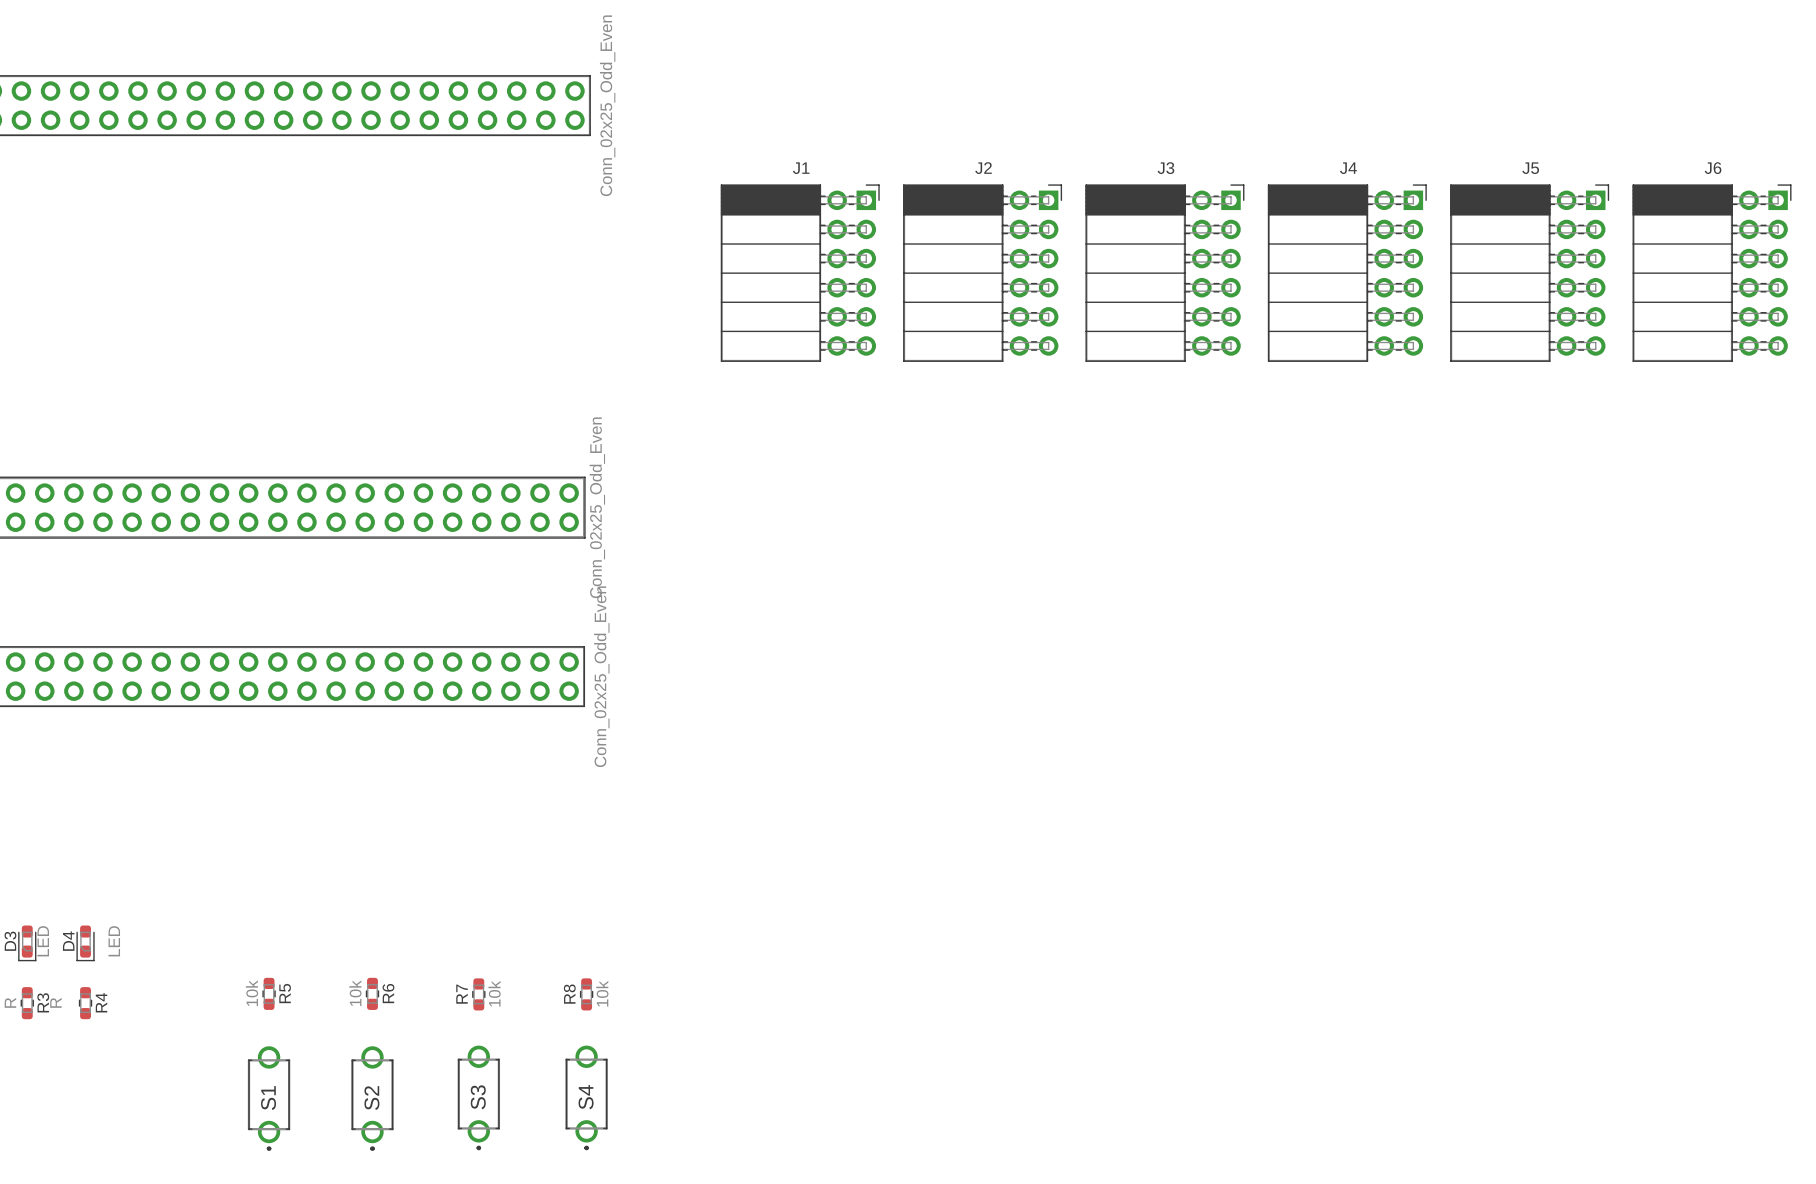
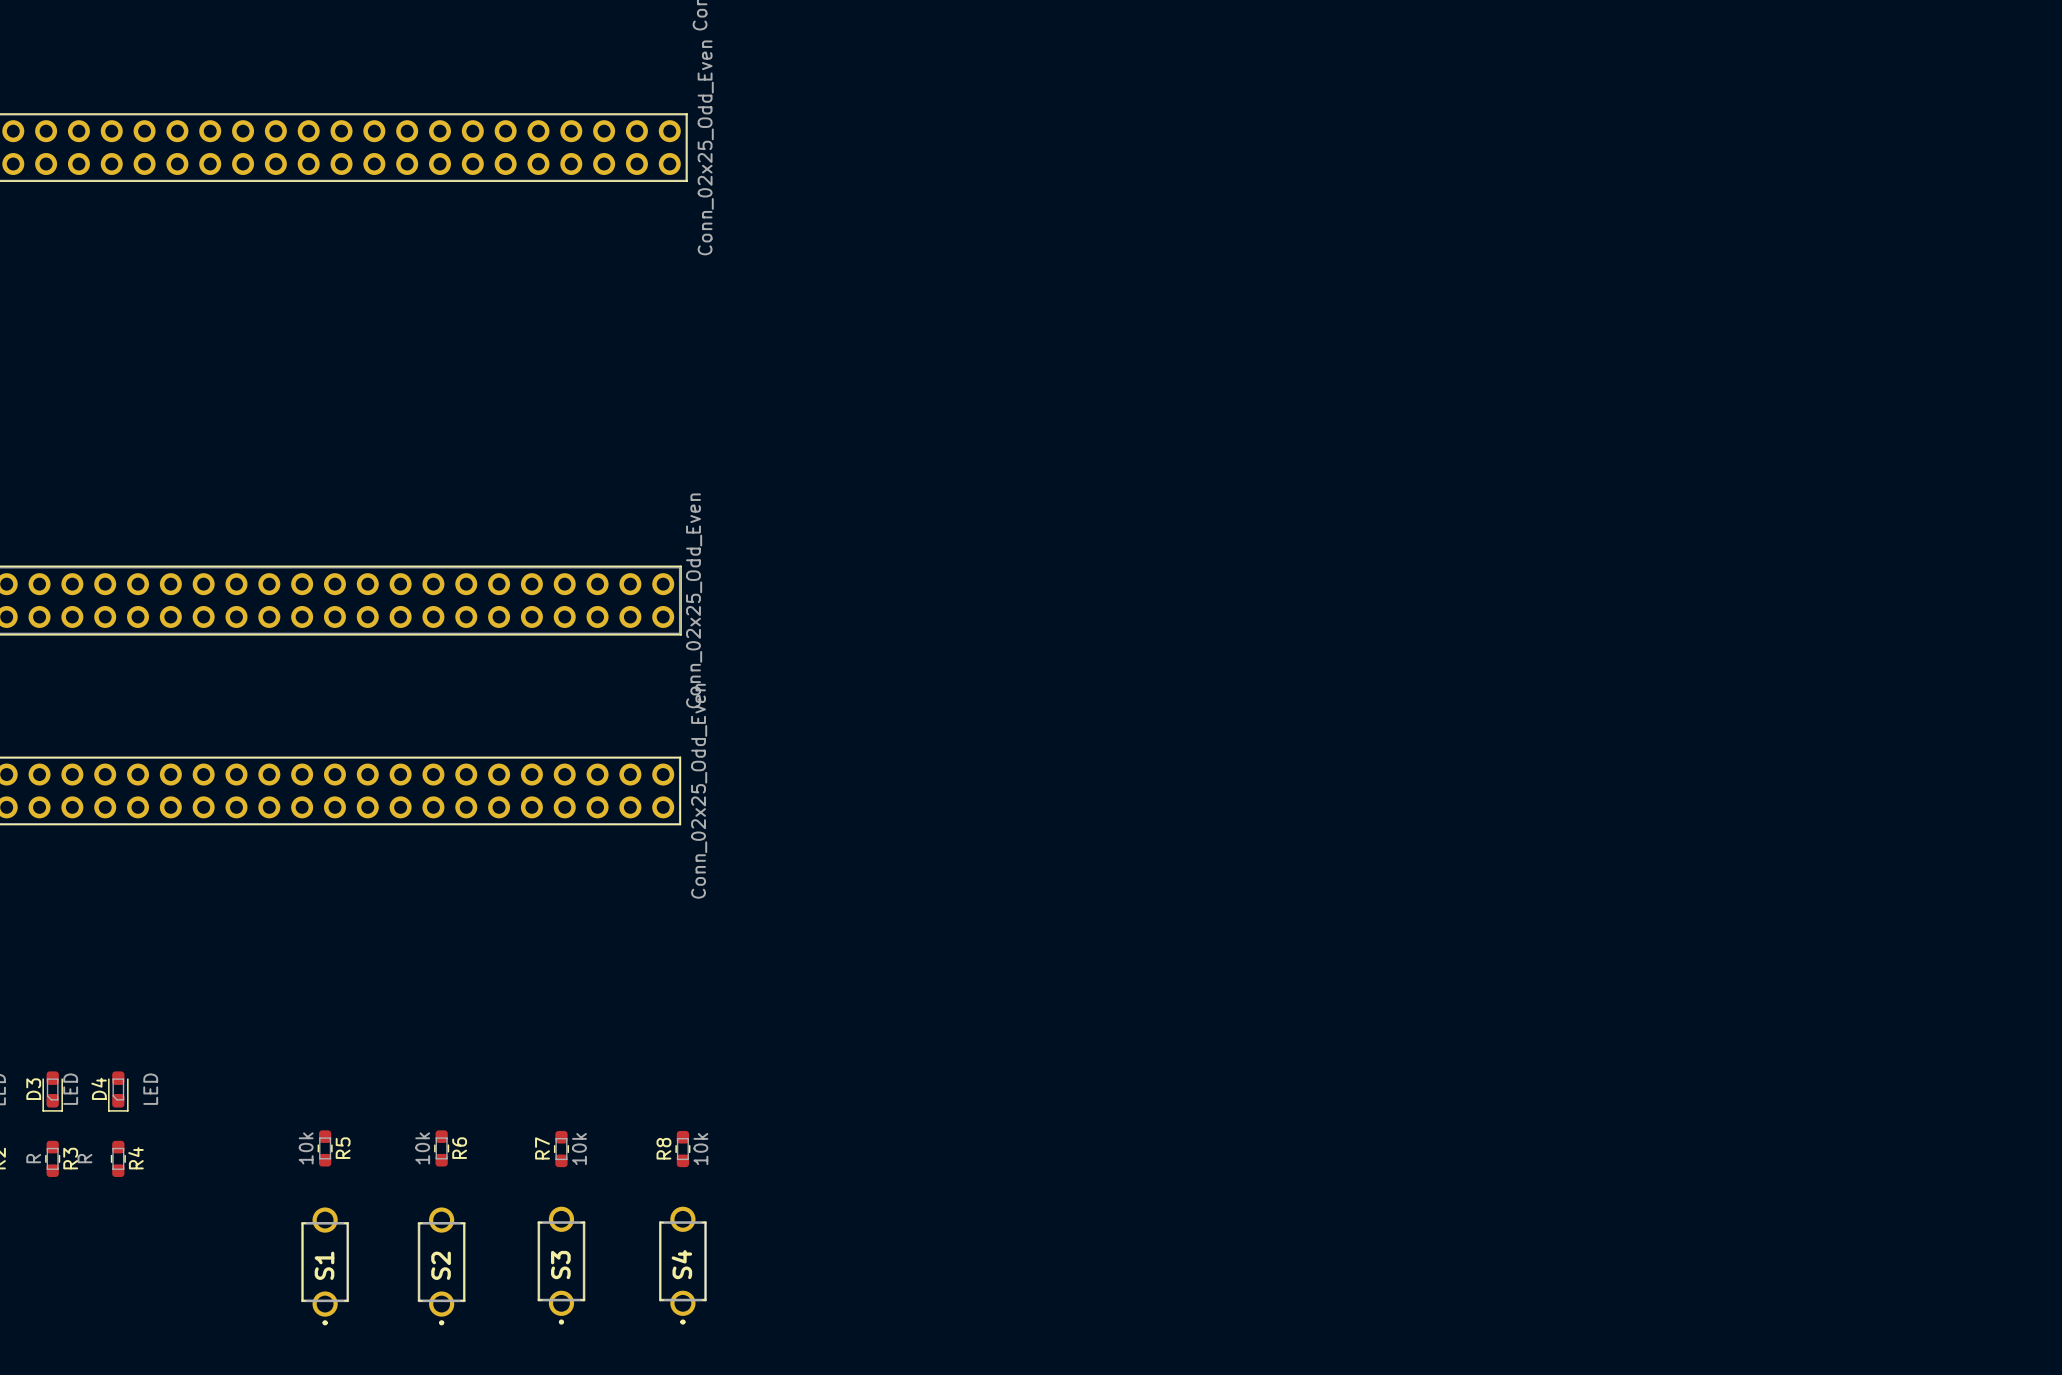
J1: (800, 273) -> none
J2: (982, 273) -> none
J3: (1164, 273) -> none
J4: (1347, 273) -> none
J5: (1529, 273) -> none
J6: (1712, 273) -> none

